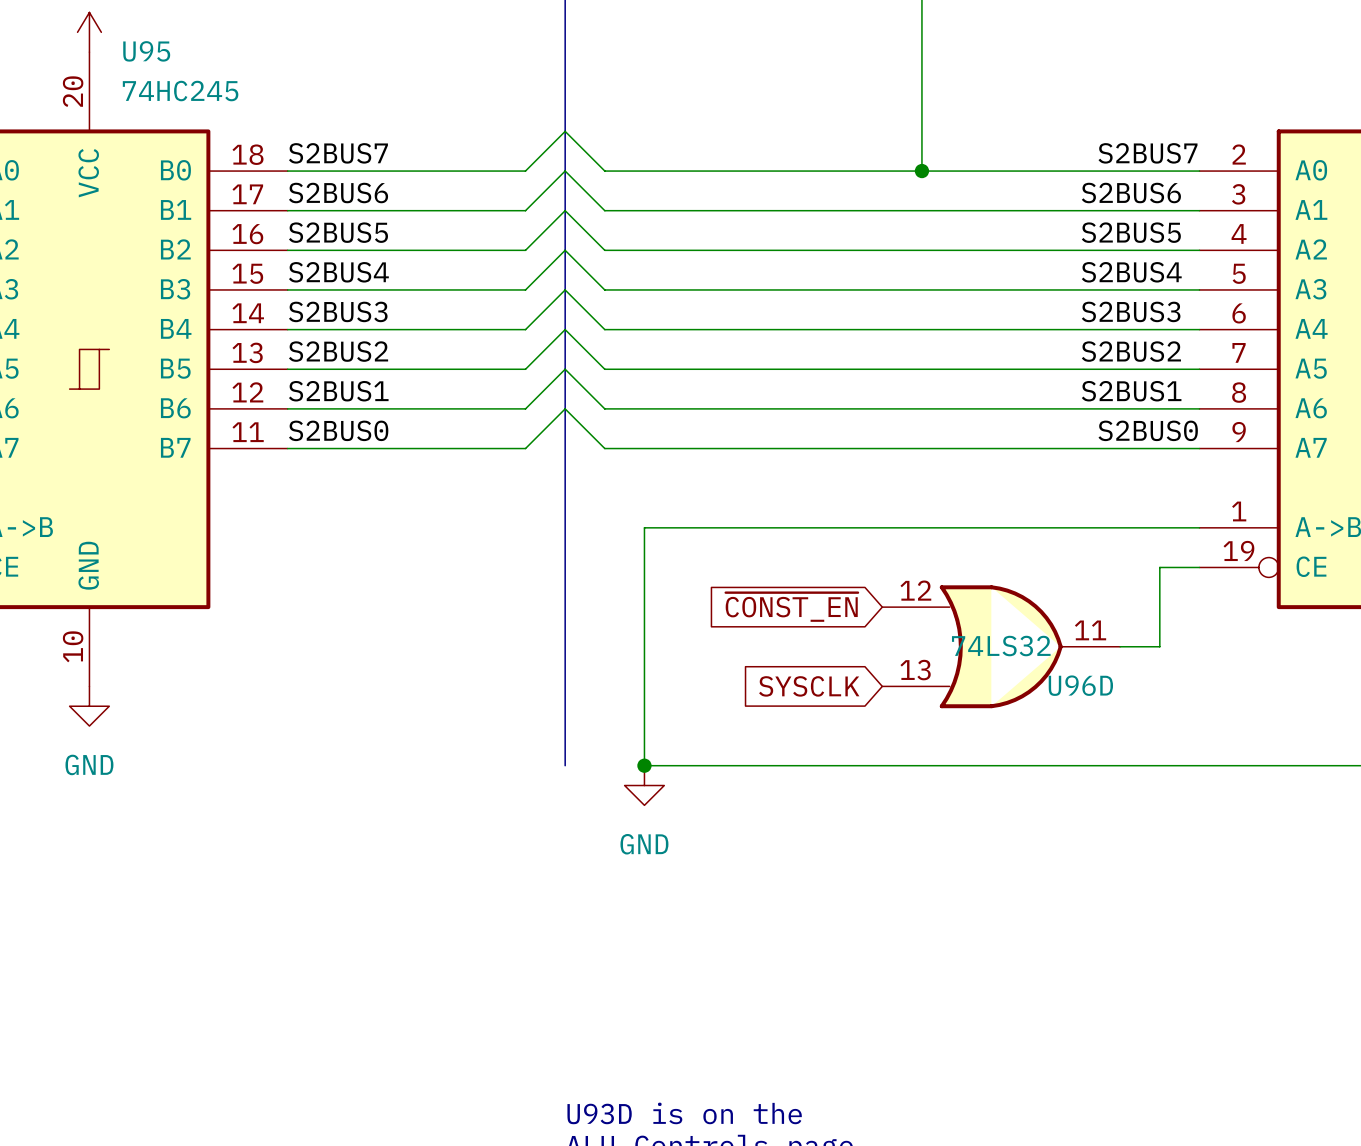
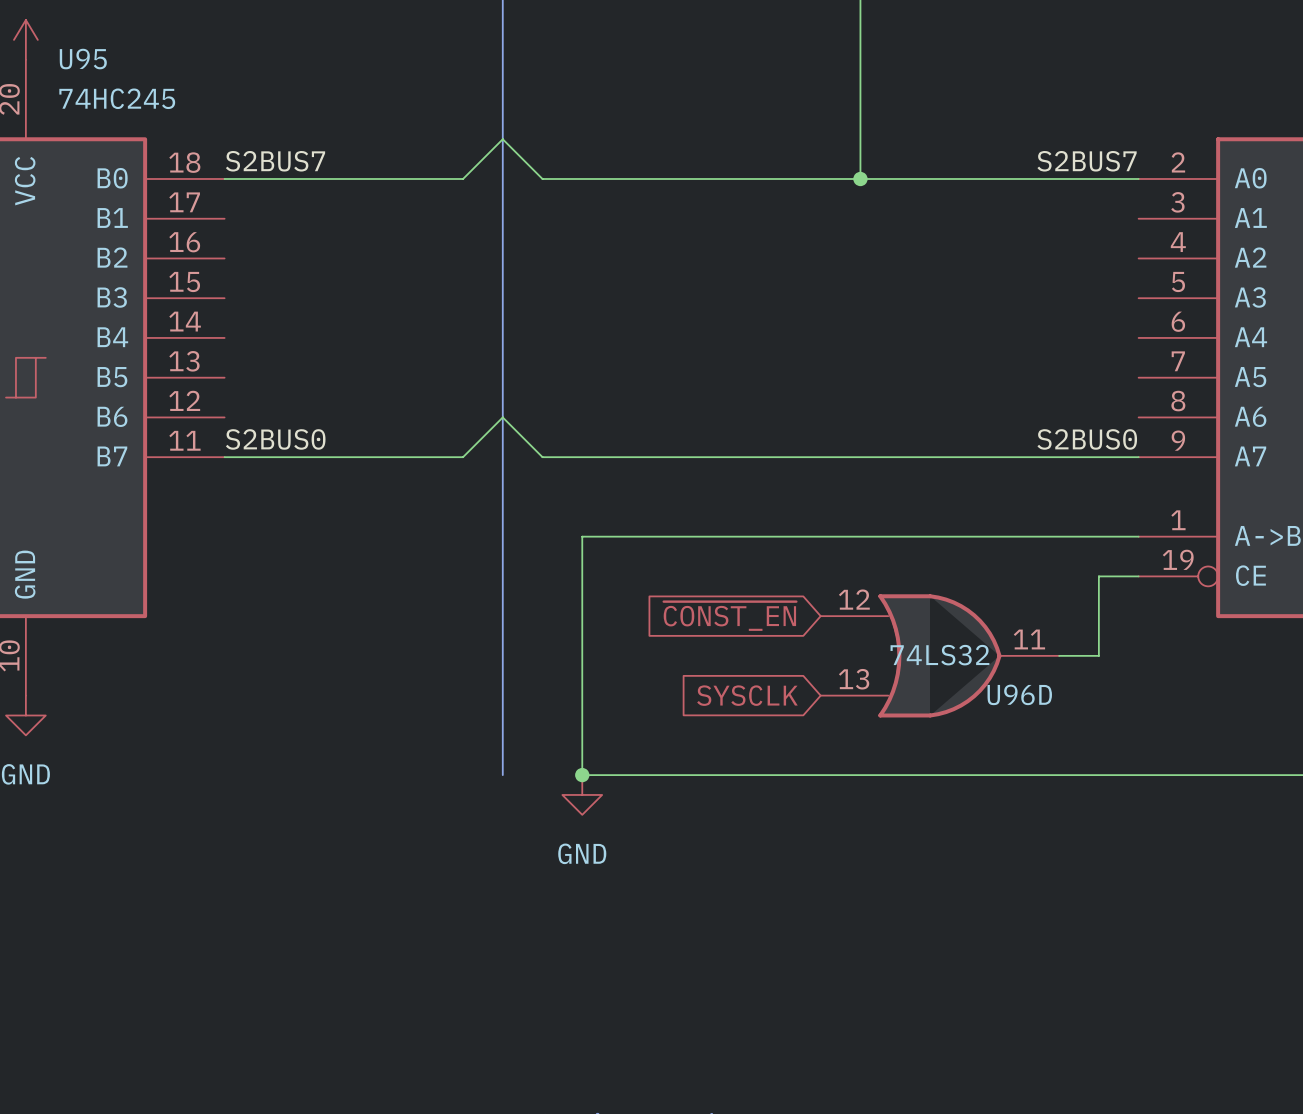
label: S2BUS6 (338, 193) -> none
label: S2BUS6 (1131, 193) -> none
wire: (287, 210) (525, 210) (565, 171) (604, 210) (1199, 210) -> none
label: S2BUS5 (338, 232) -> none
label: S2BUS5 (1131, 232) -> none
wire: (287, 250) (525, 250) (565, 210) (604, 250) (1199, 250) -> none
label: S2BUS4 (338, 272) -> none
label: S2BUS4 (1131, 272) -> none
wire: (287, 289) (525, 289) (565, 250) (604, 289) (1199, 289) -> none
label: S2BUS3 (338, 311) -> none
label: S2BUS3 (1131, 311) -> none
wire: (287, 329) (525, 329) (565, 289) (604, 329) (1199, 329) -> none
label: S2BUS2 (338, 351) -> none
label: S2BUS2 (1131, 351) -> none
wire: (287, 369) (525, 369) (565, 329) (604, 369) (1199, 369) -> none
label: S2BUS1 (338, 391) -> none
label: S2BUS1 (1131, 391) -> none
wire: (287, 408) (525, 408) (565, 369) (604, 408) (1199, 408) -> none

